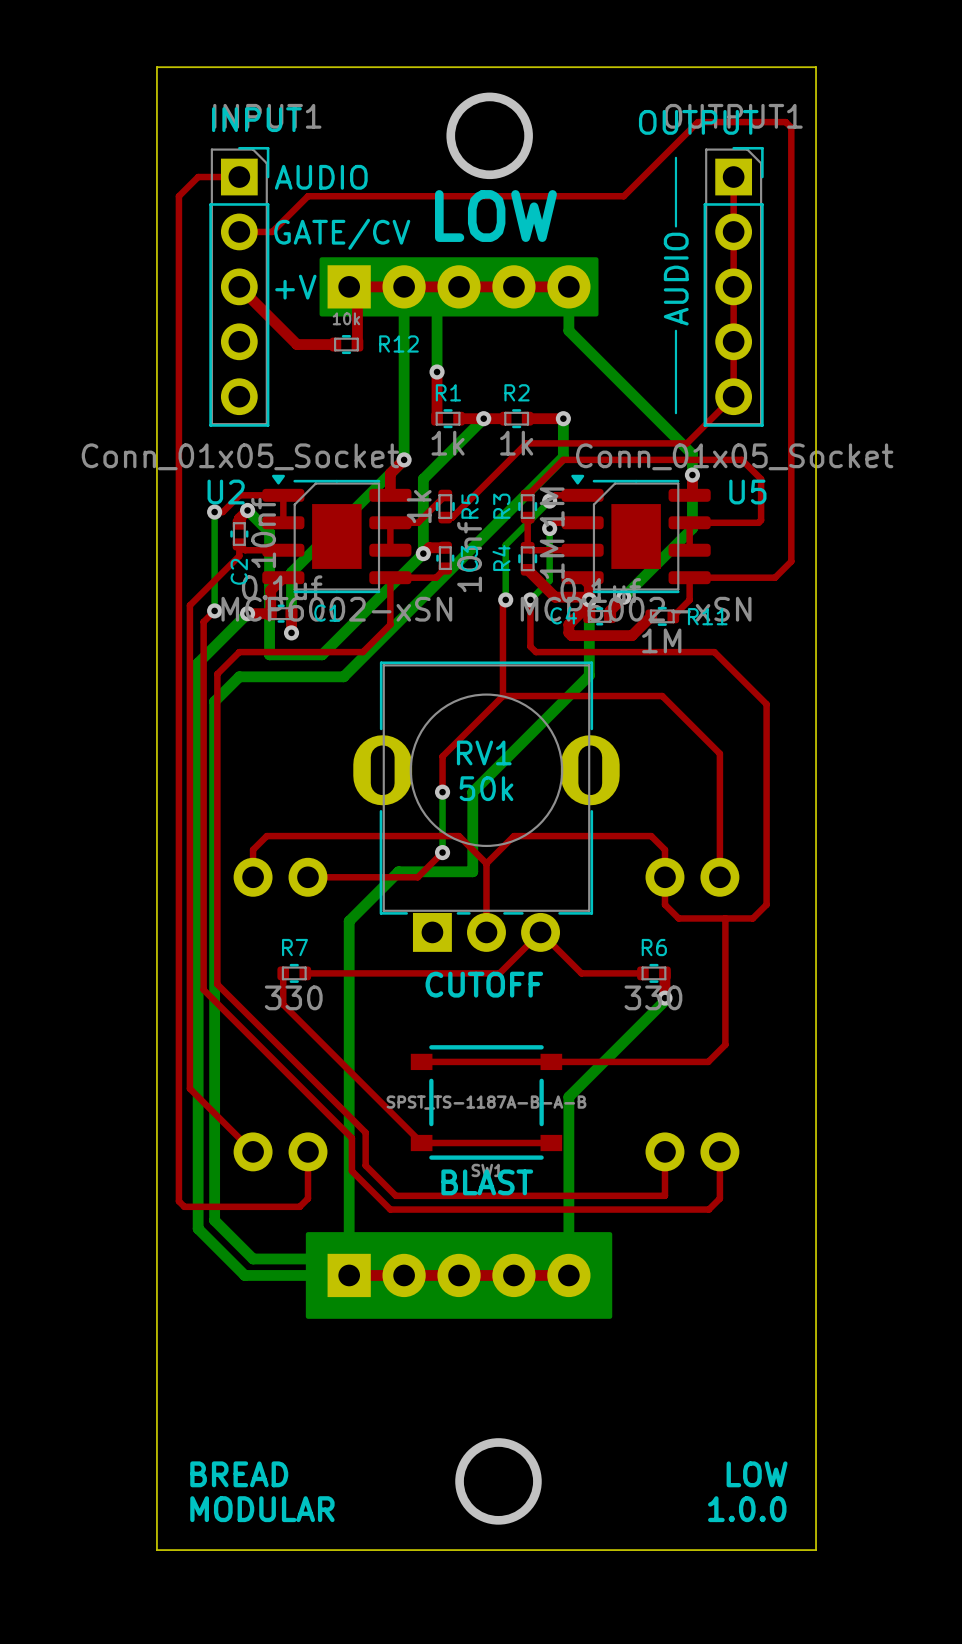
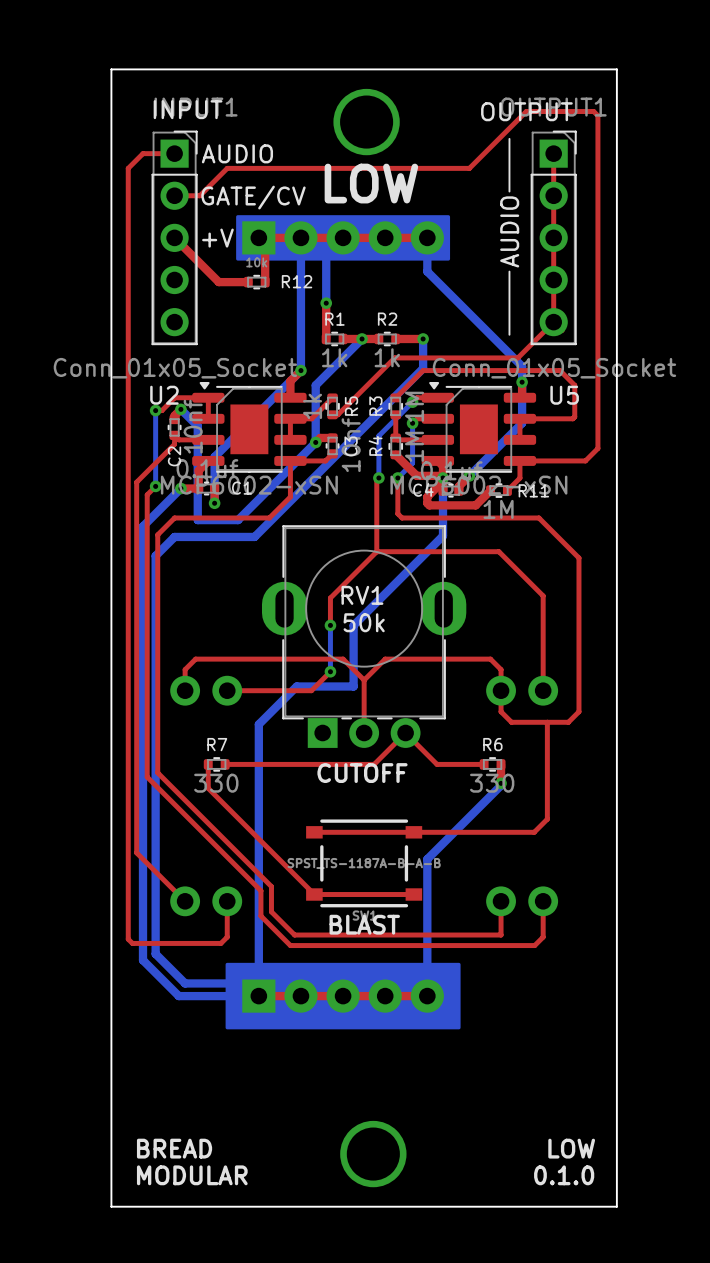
text: 1.0.0 (747, 1509) -> 0.1.0 (564, 1175)

